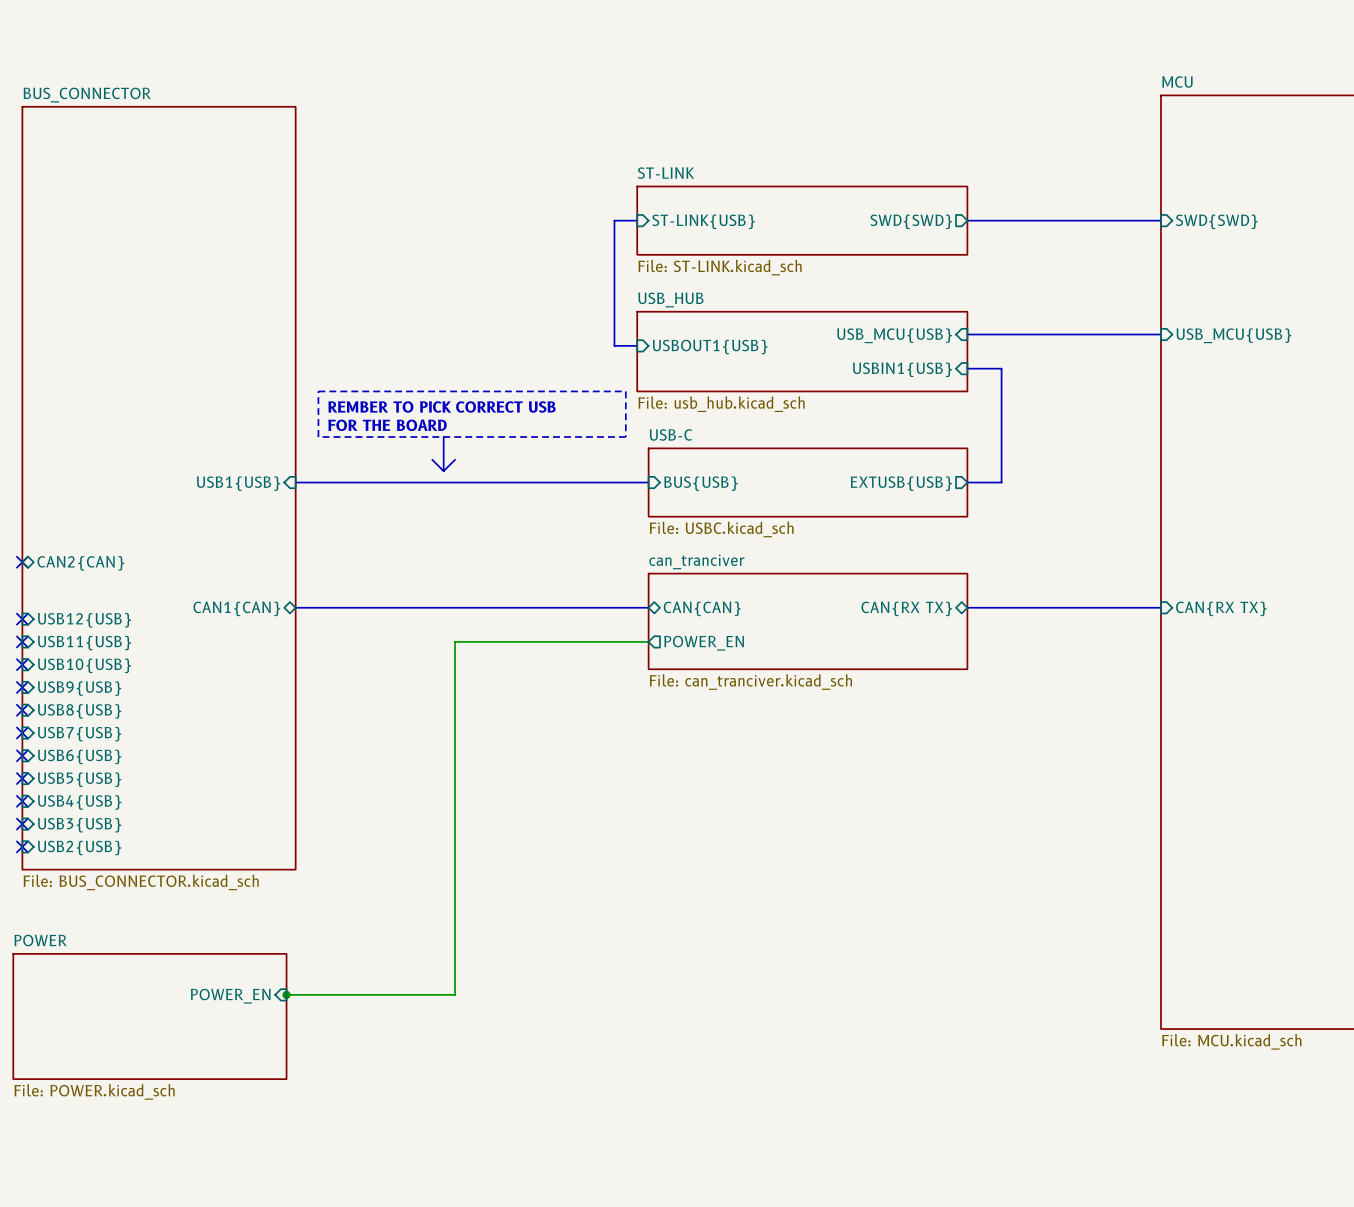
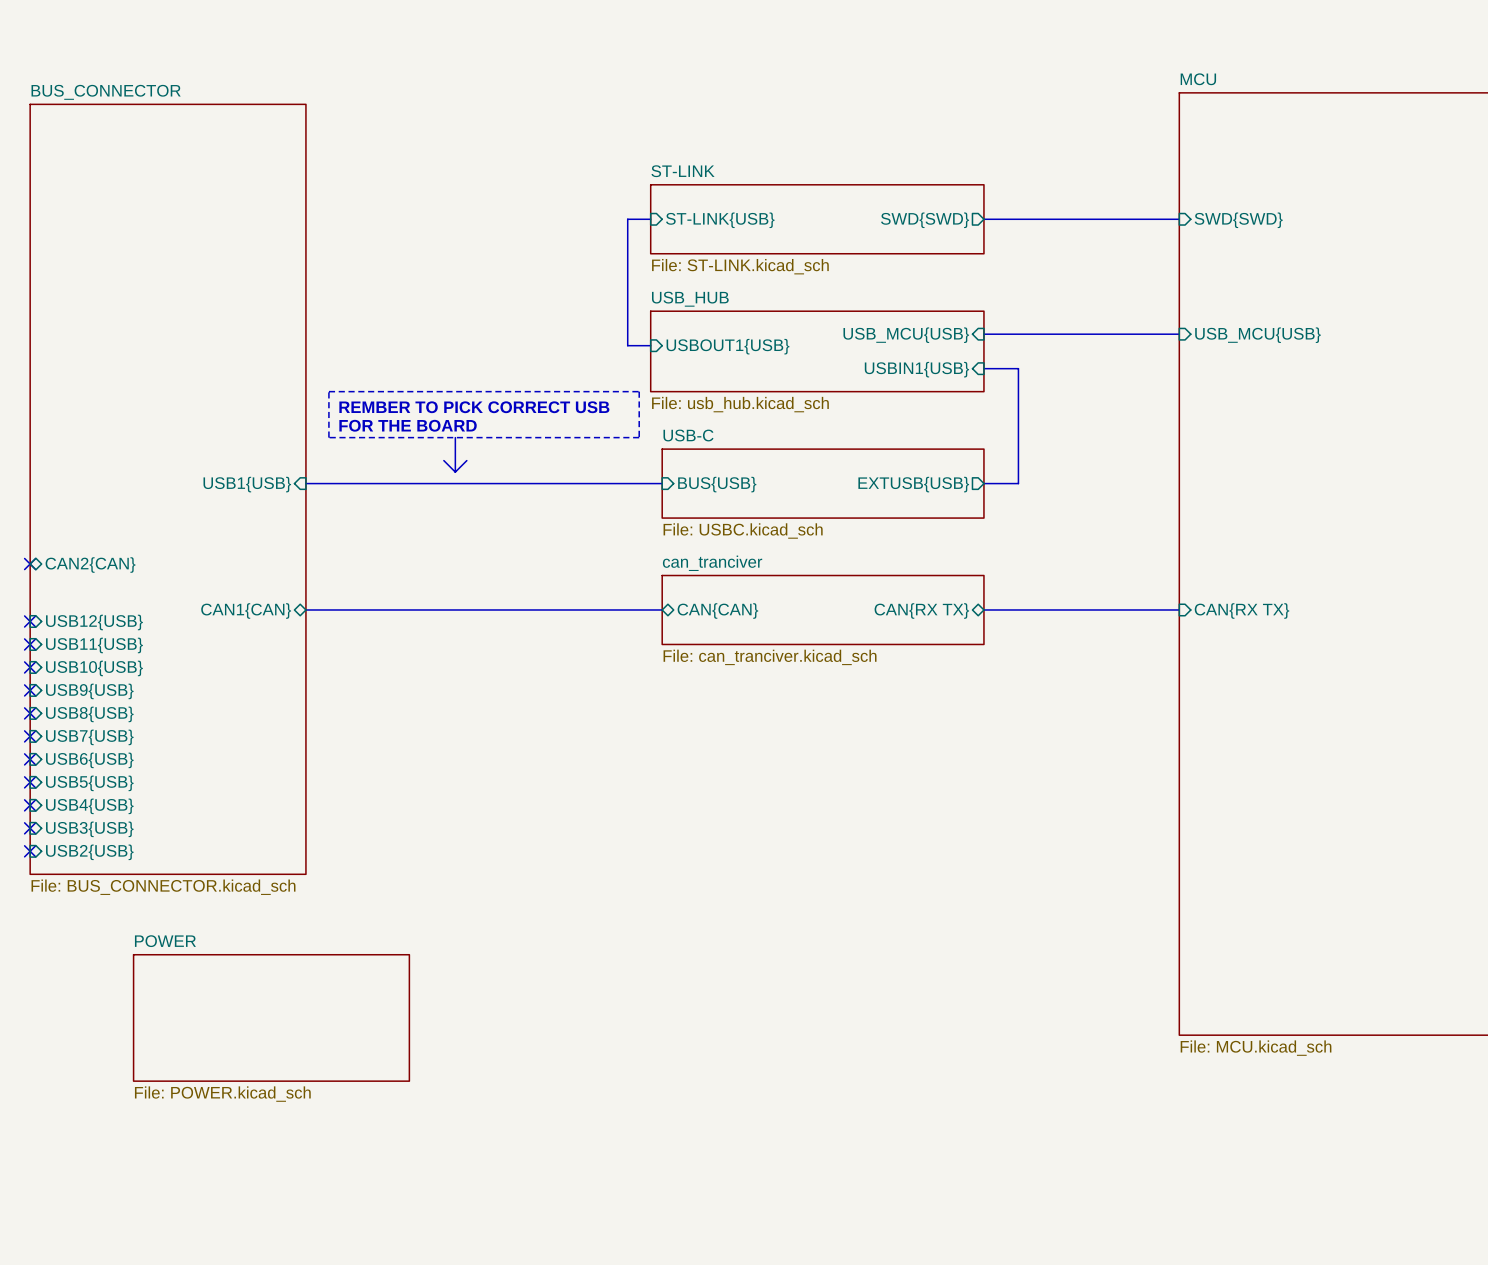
sheet can_tranciver: none -> File: can_tranciver.kicad_sch (823, 609)
sheet can_tranciver: File: can_tranciver.kicad_sch (808, 621) -> none
wire: (648, 641) (455, 641) (455, 994) (284, 994) -> none
sheet pin: POWER_EN (704, 643) -> none
junction: (286, 994) -> none
sheet pin: POWER_EN (230, 996) -> none
sheet POWER position: (149, 1016) -> (271, 1017)

